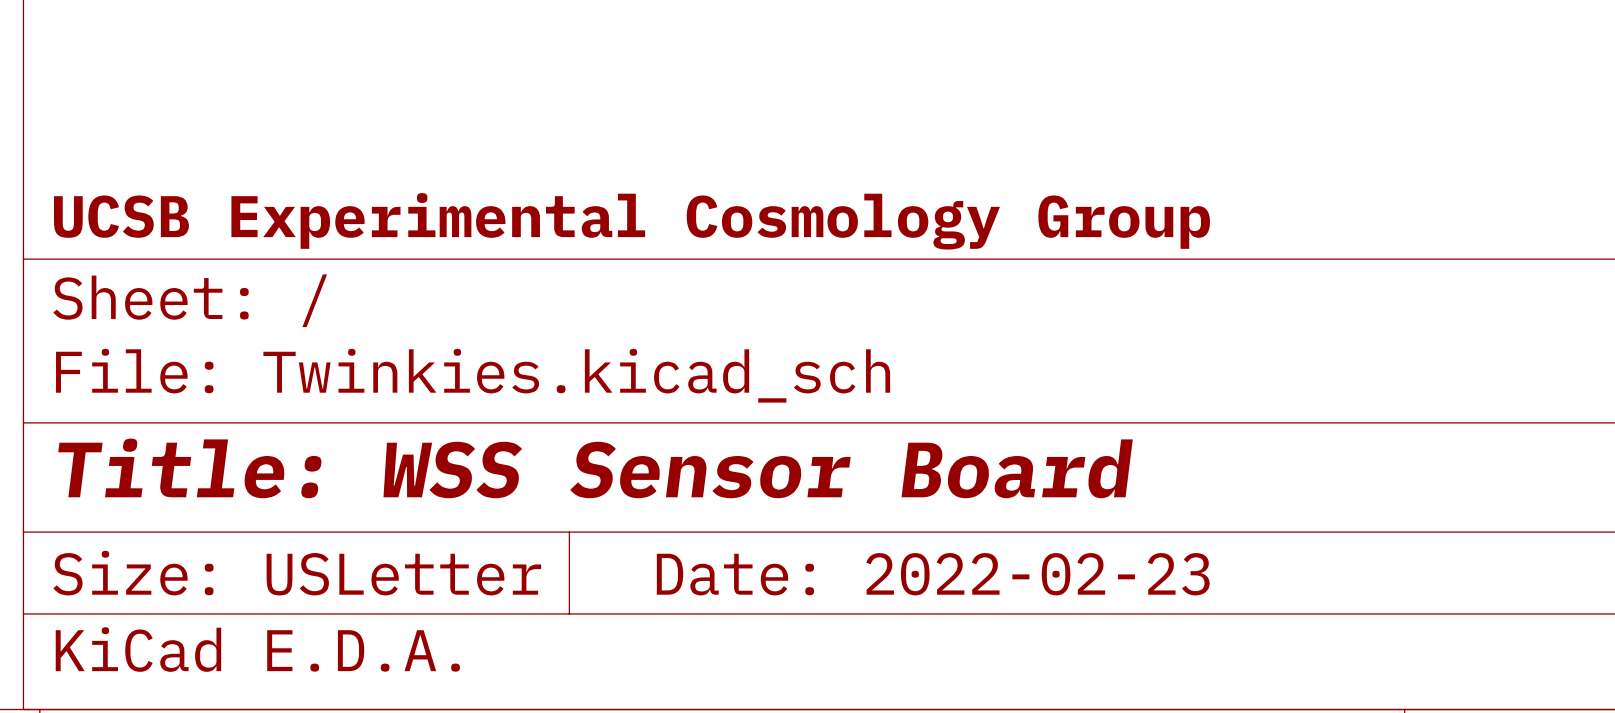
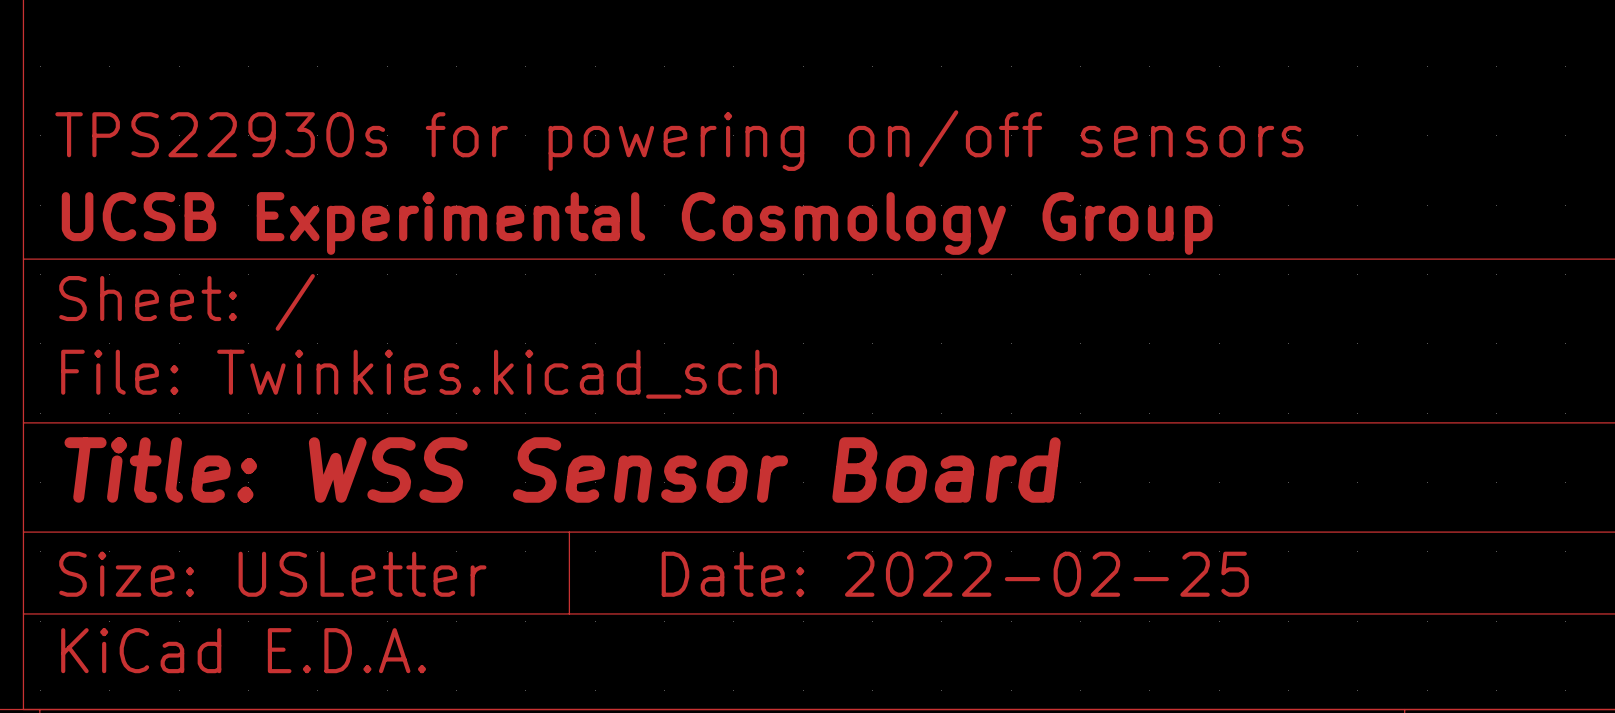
title block: none -> TPS22930s for powering on/off sensors (679, 140)
title block: Date: 2022-02-23 (933, 574) -> Date: 2022-02-25 (955, 574)

